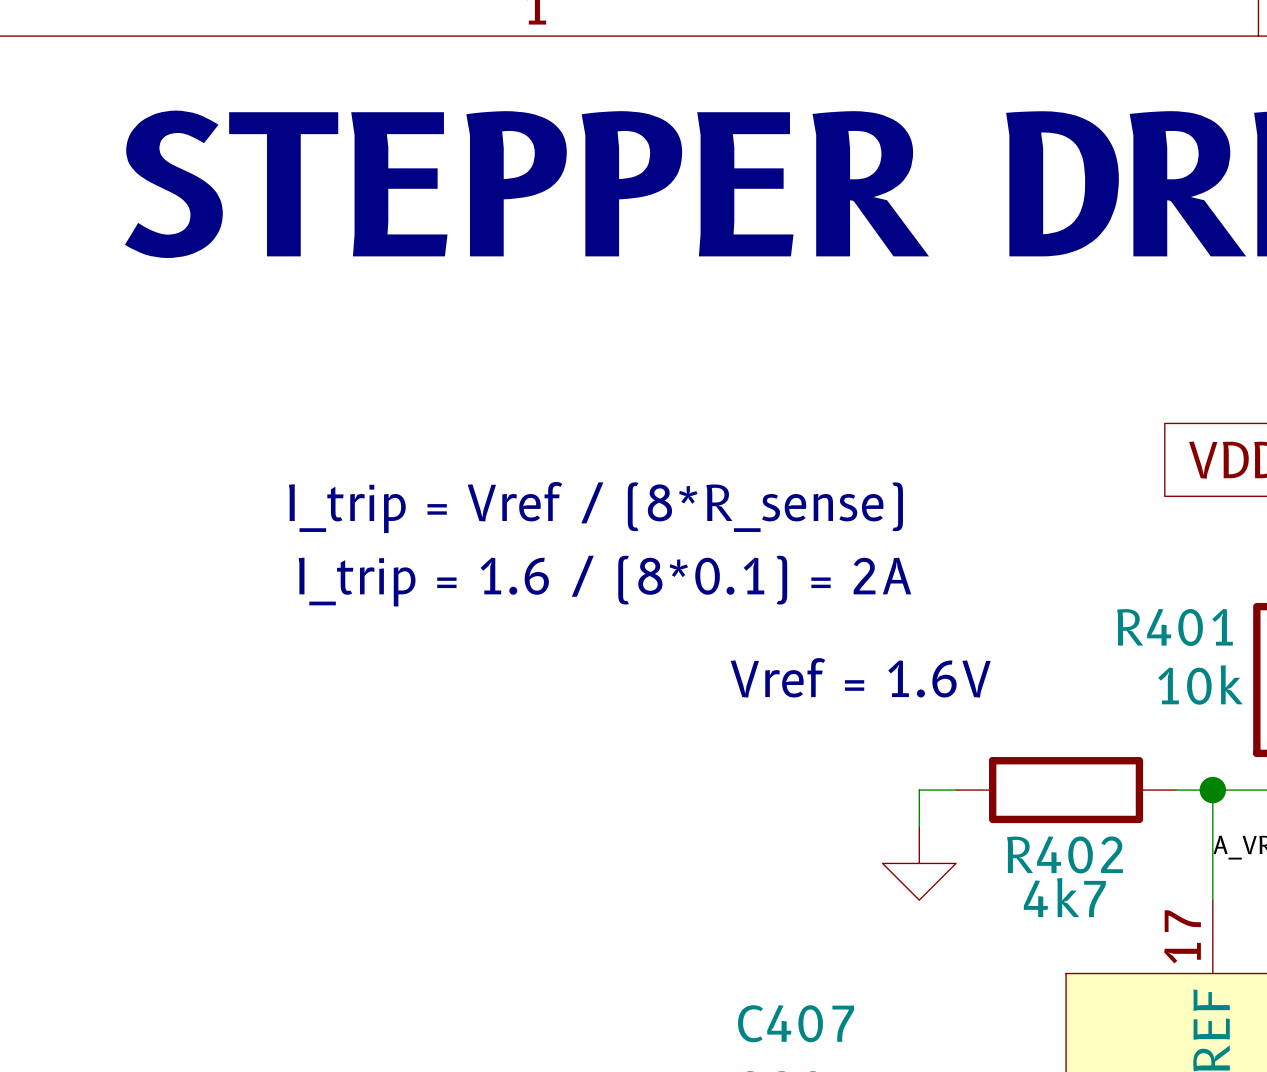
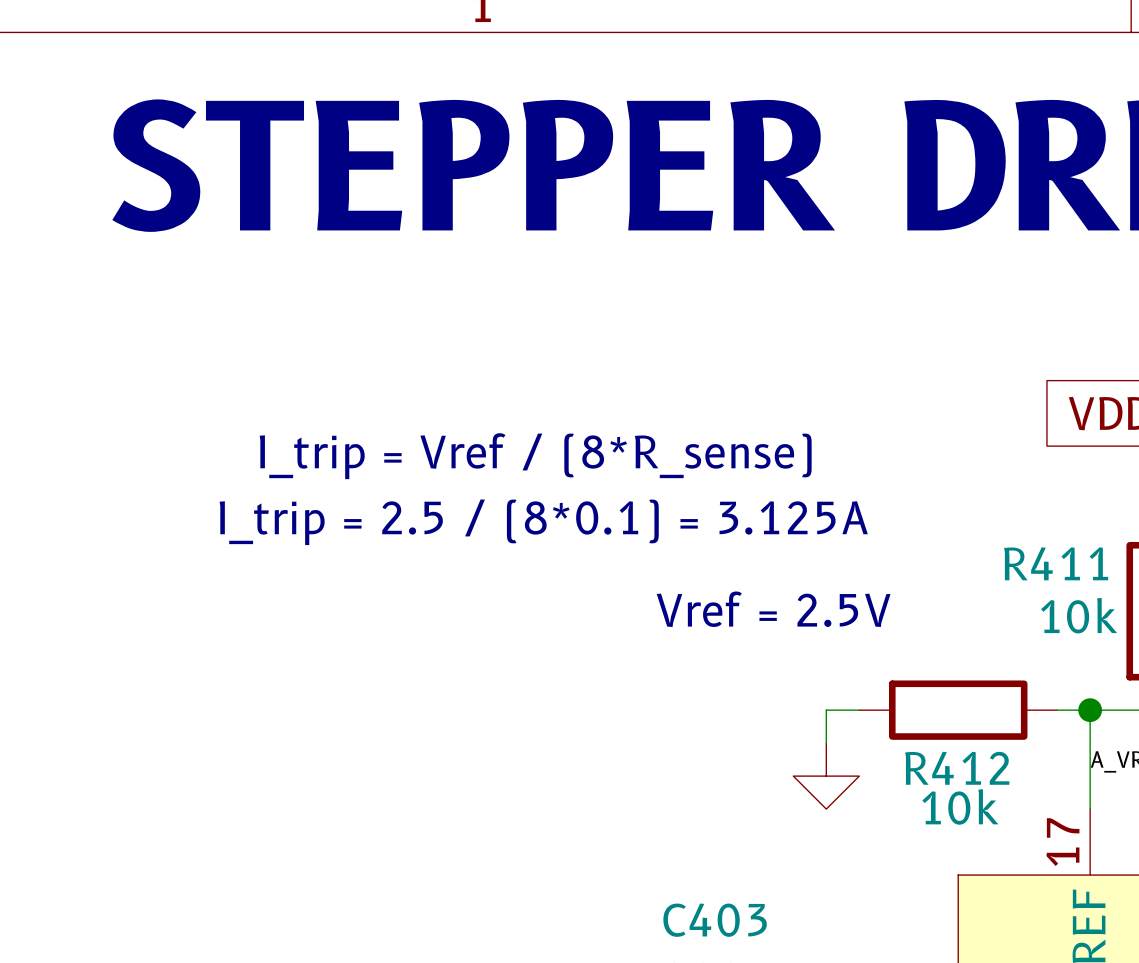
text: I_trip = 1.6 / (8*0.1) = 2A (604, 581) -> I_trip = 2.5 / (8*0.1) = 3.125A (543, 522)
R401 name: R401 (1174, 627) -> R411 (1056, 563)
text: Vref = 1.6V (860, 677) -> Vref = 2.5V (773, 609)
R402 name: R402 (1064, 854) -> R412 (957, 768)
R402 value: 4k7 (1064, 897) -> 10k (960, 806)
C407 name: C407 (796, 1023) -> C403 (715, 920)

